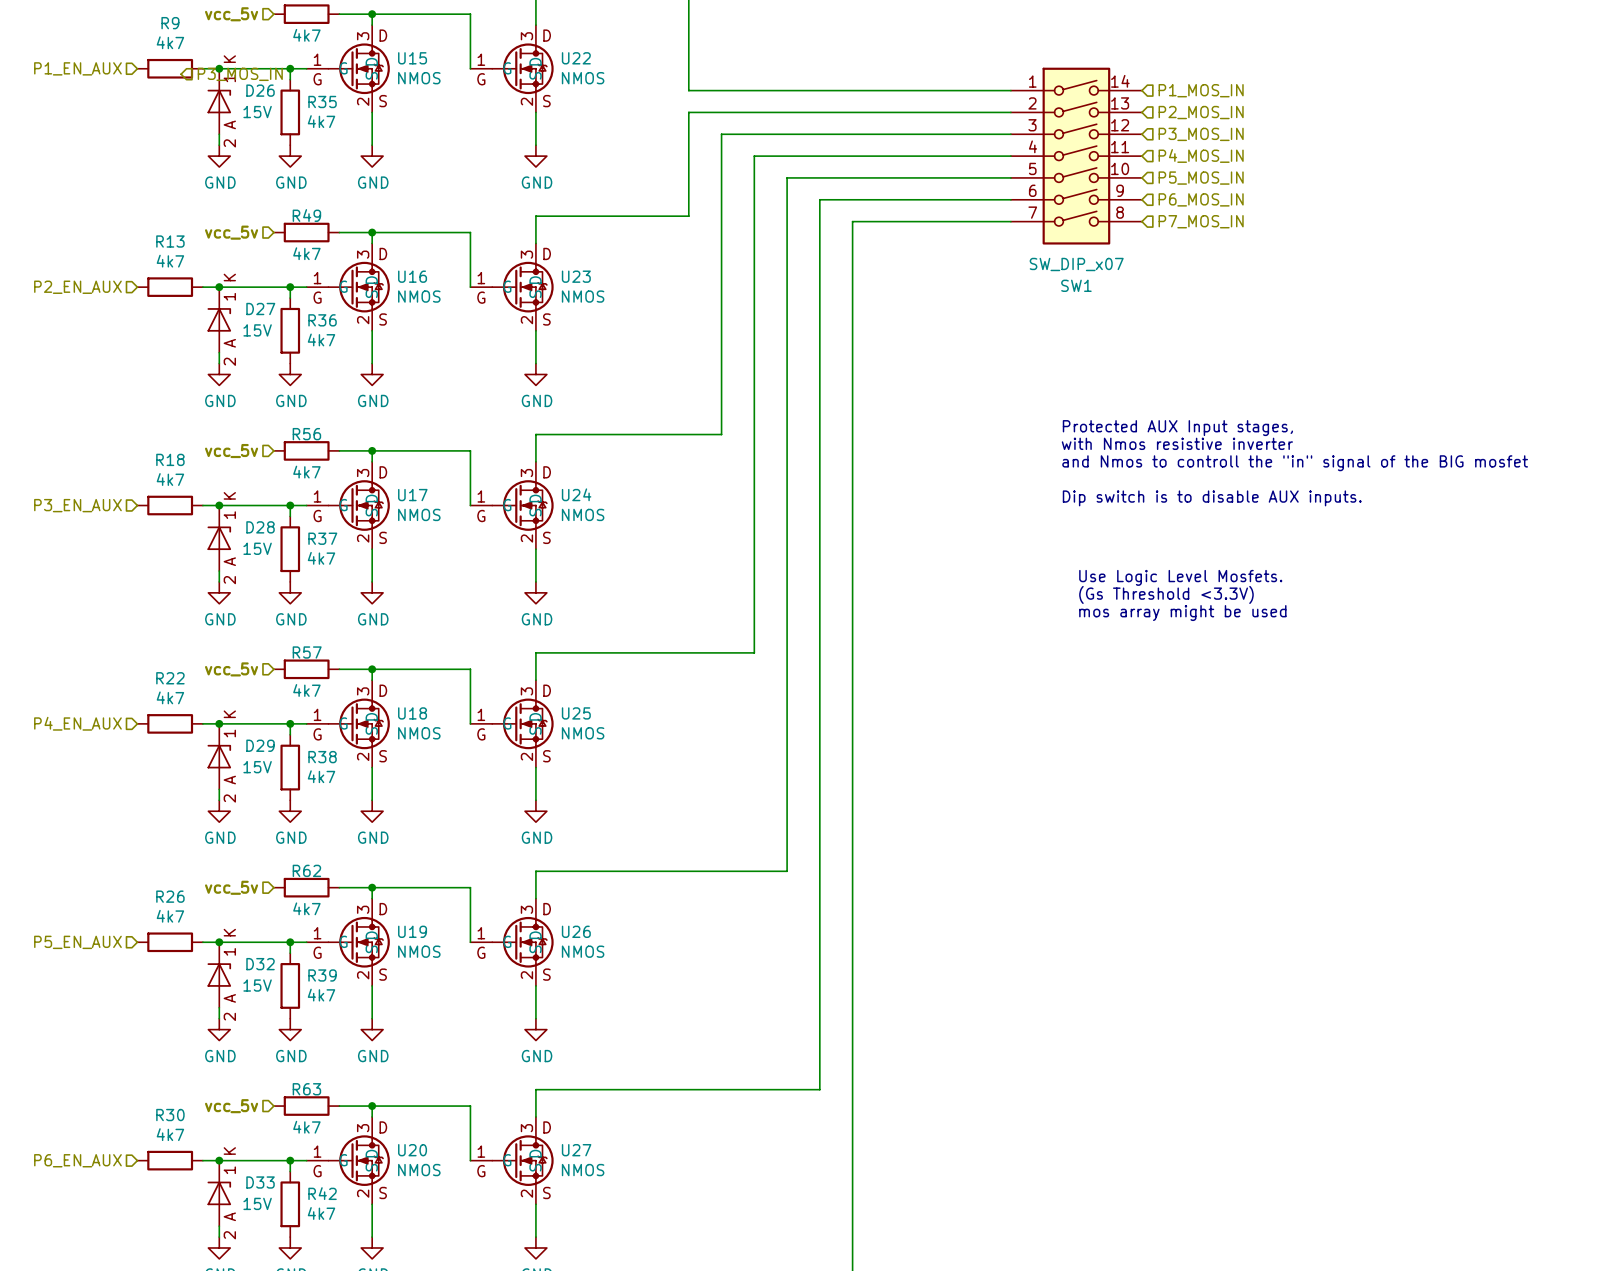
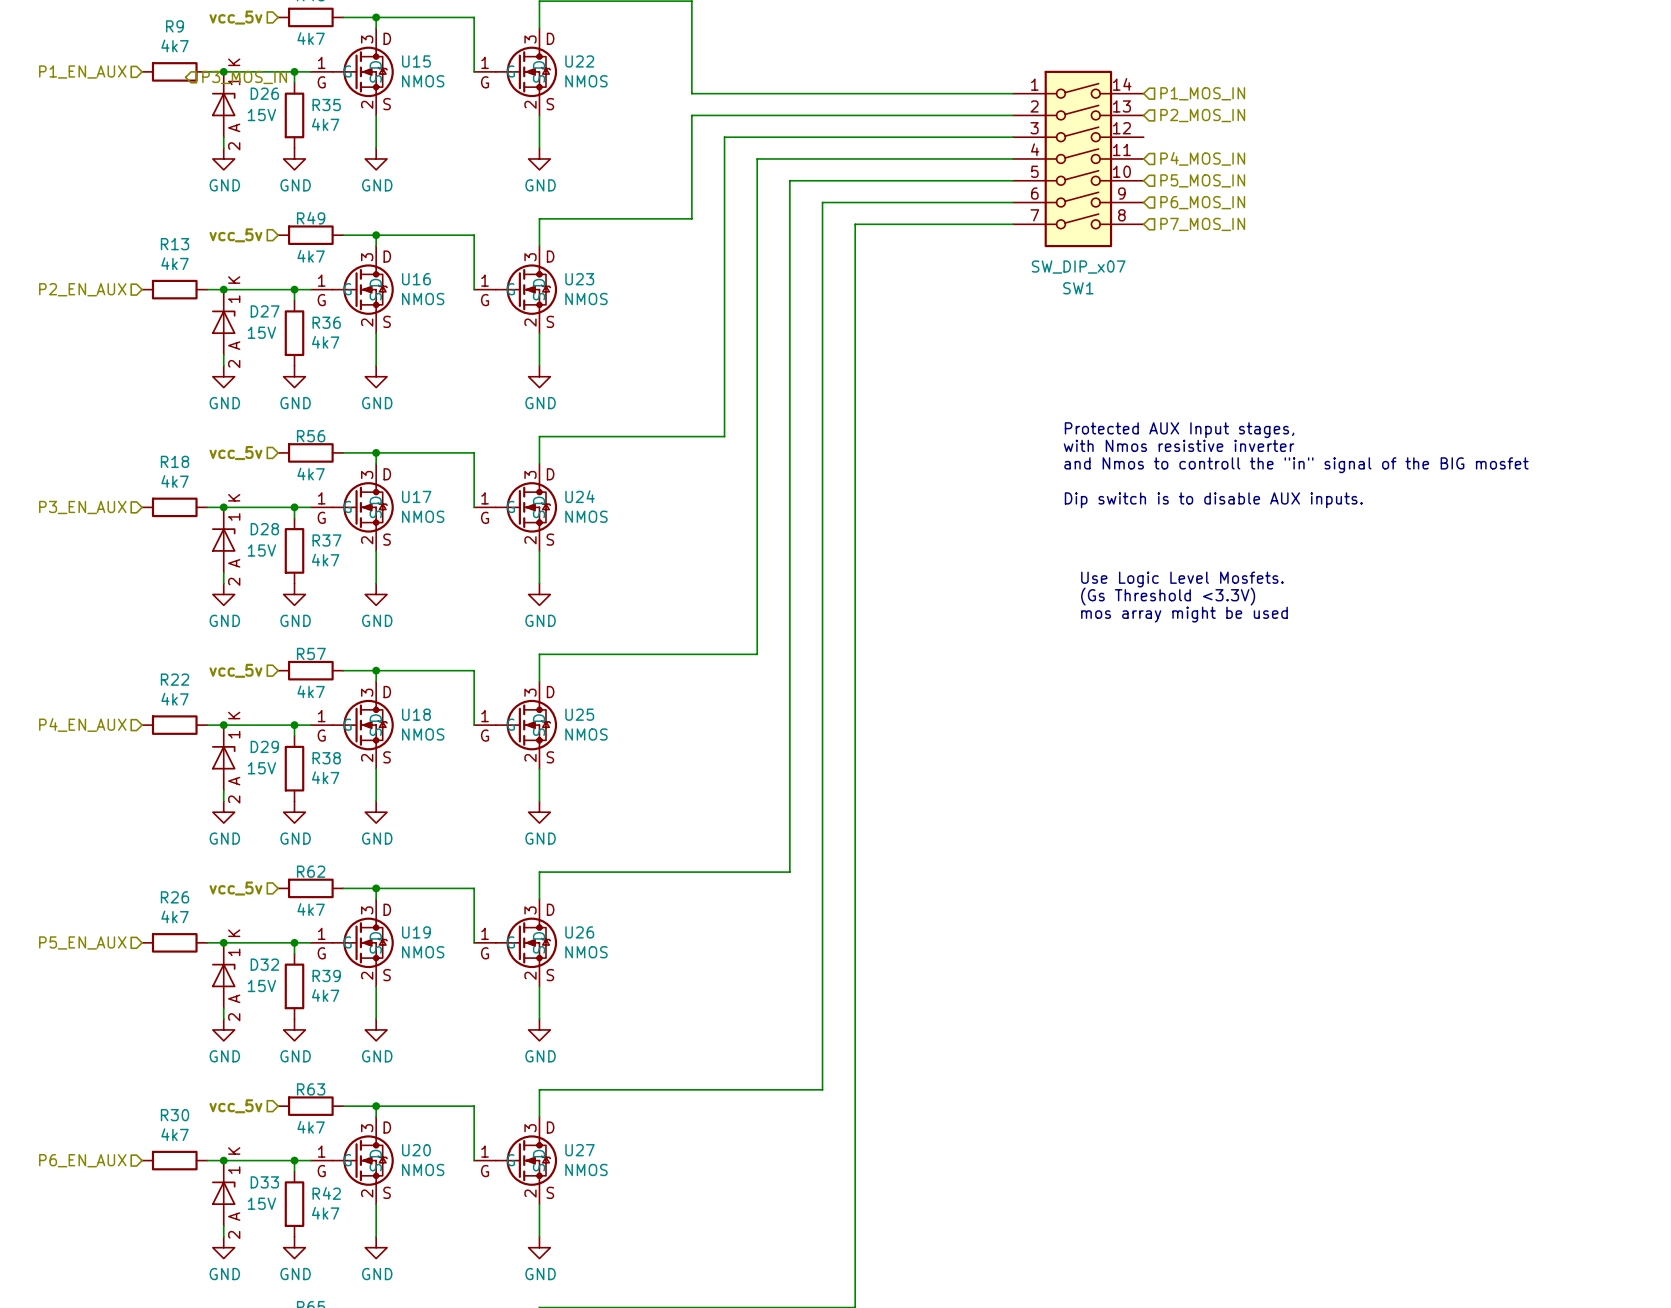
hierarchical label: P3_MOS_IN (1201, 134) -> none

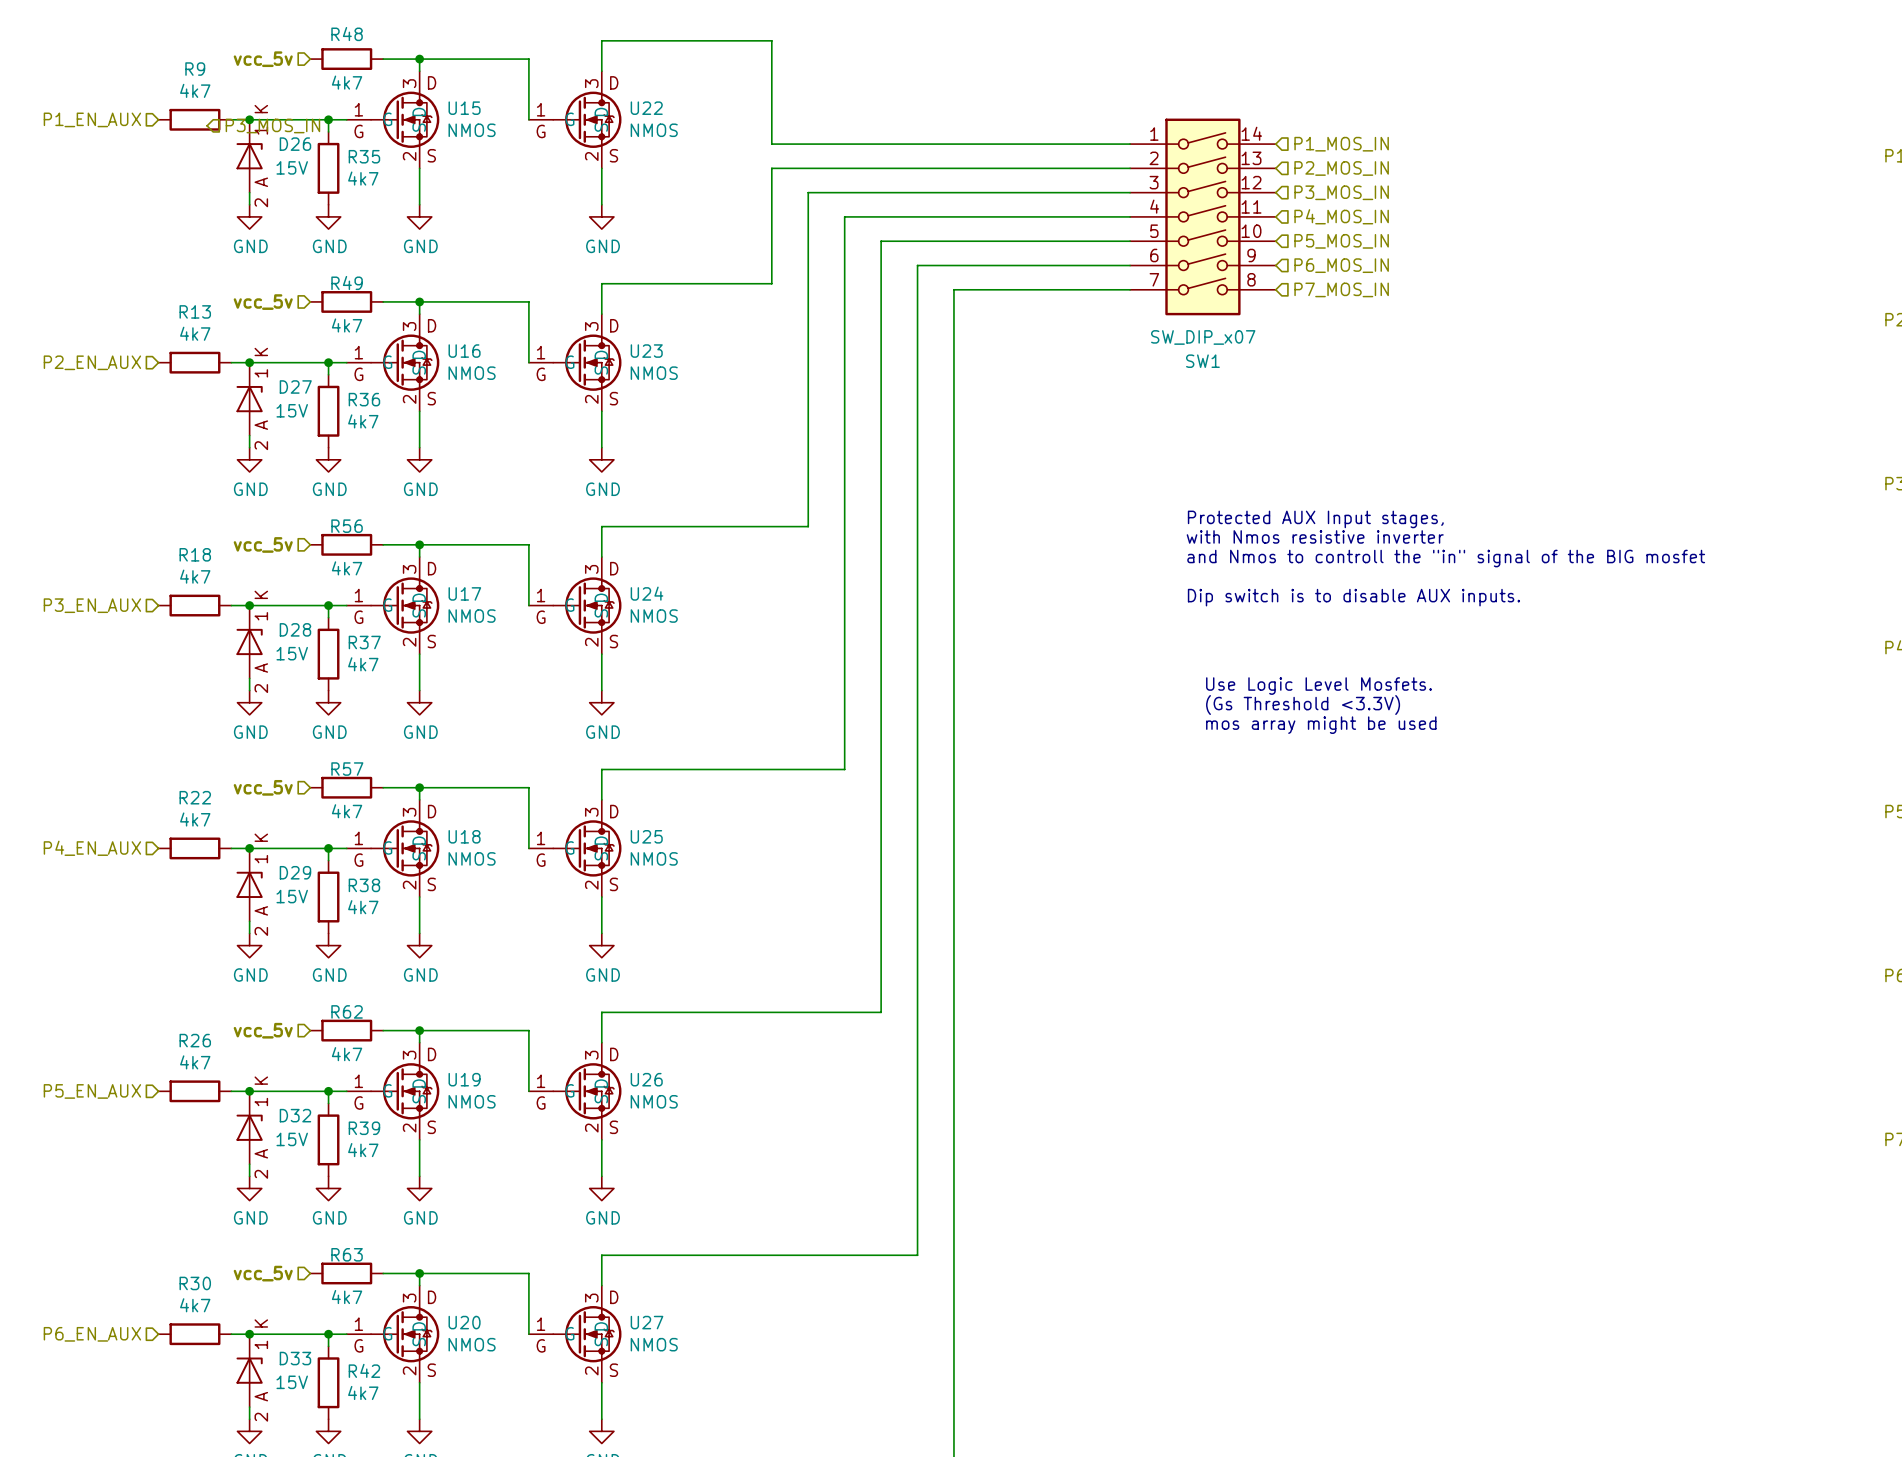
hierarchical label: none -> P3_MOS_IN (1341, 192)

